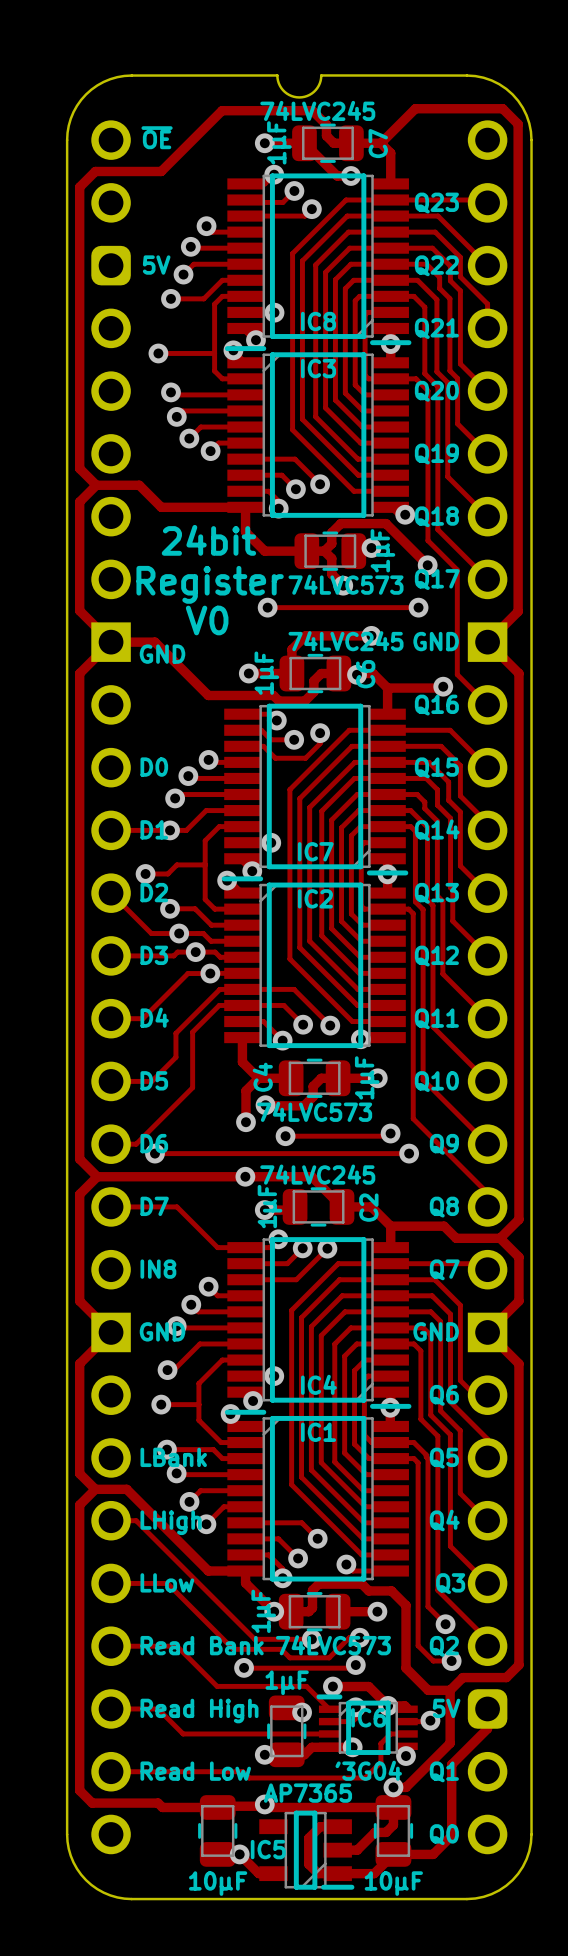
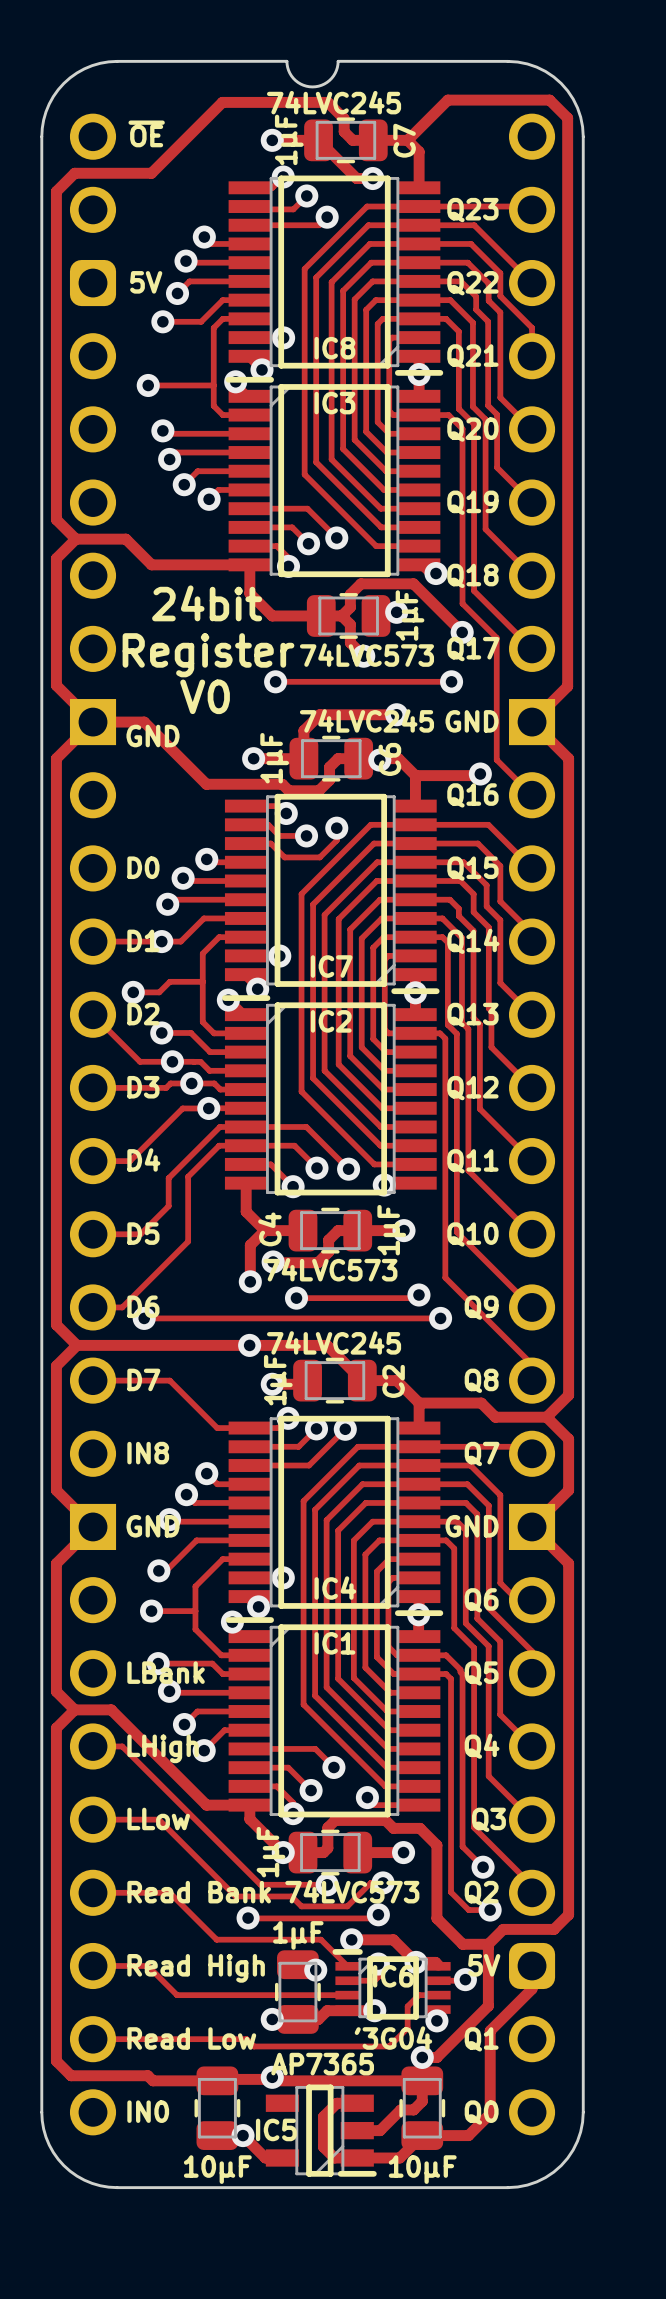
text: none -> IN0 (148, 2111)

